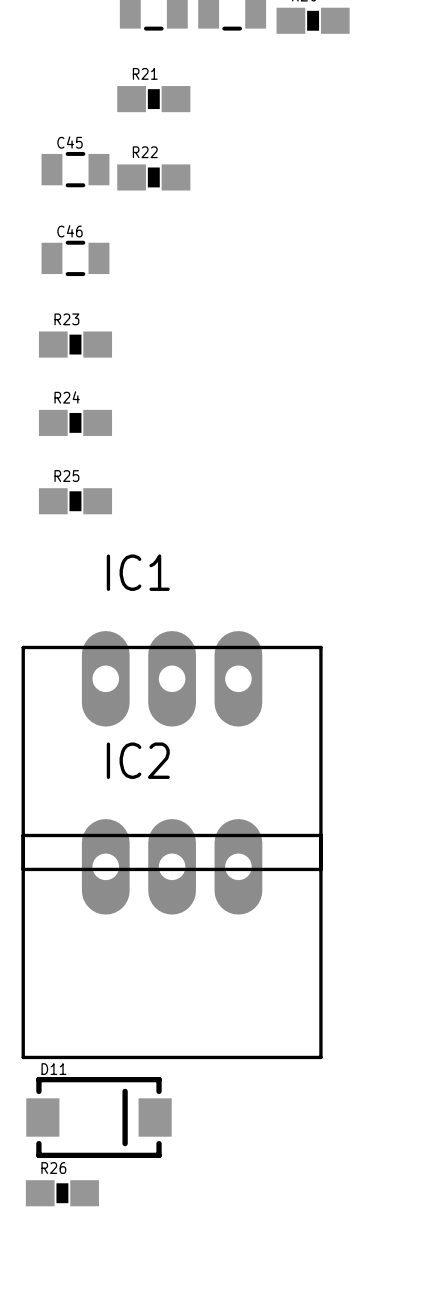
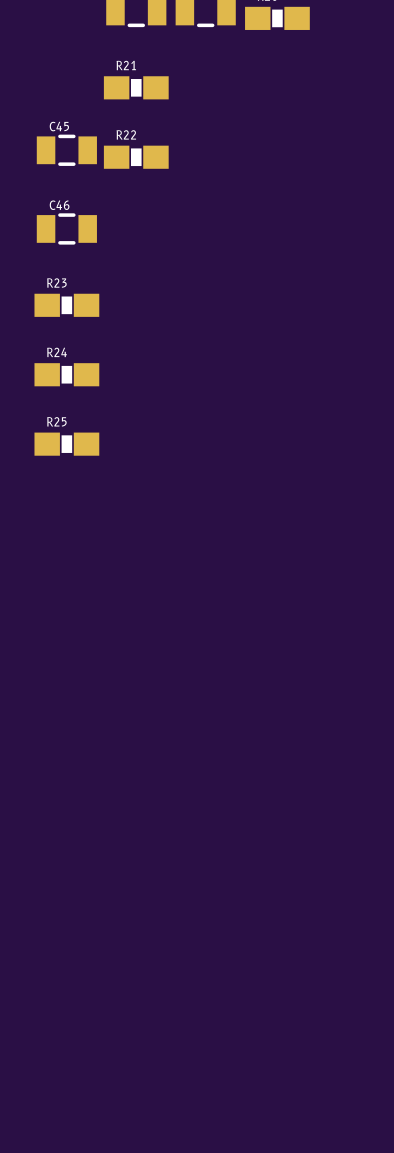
IC1: (172, 751) -> none
IC2: (172, 939) -> none
D11: (98, 1117) -> none
R26: (62, 1193) -> none

